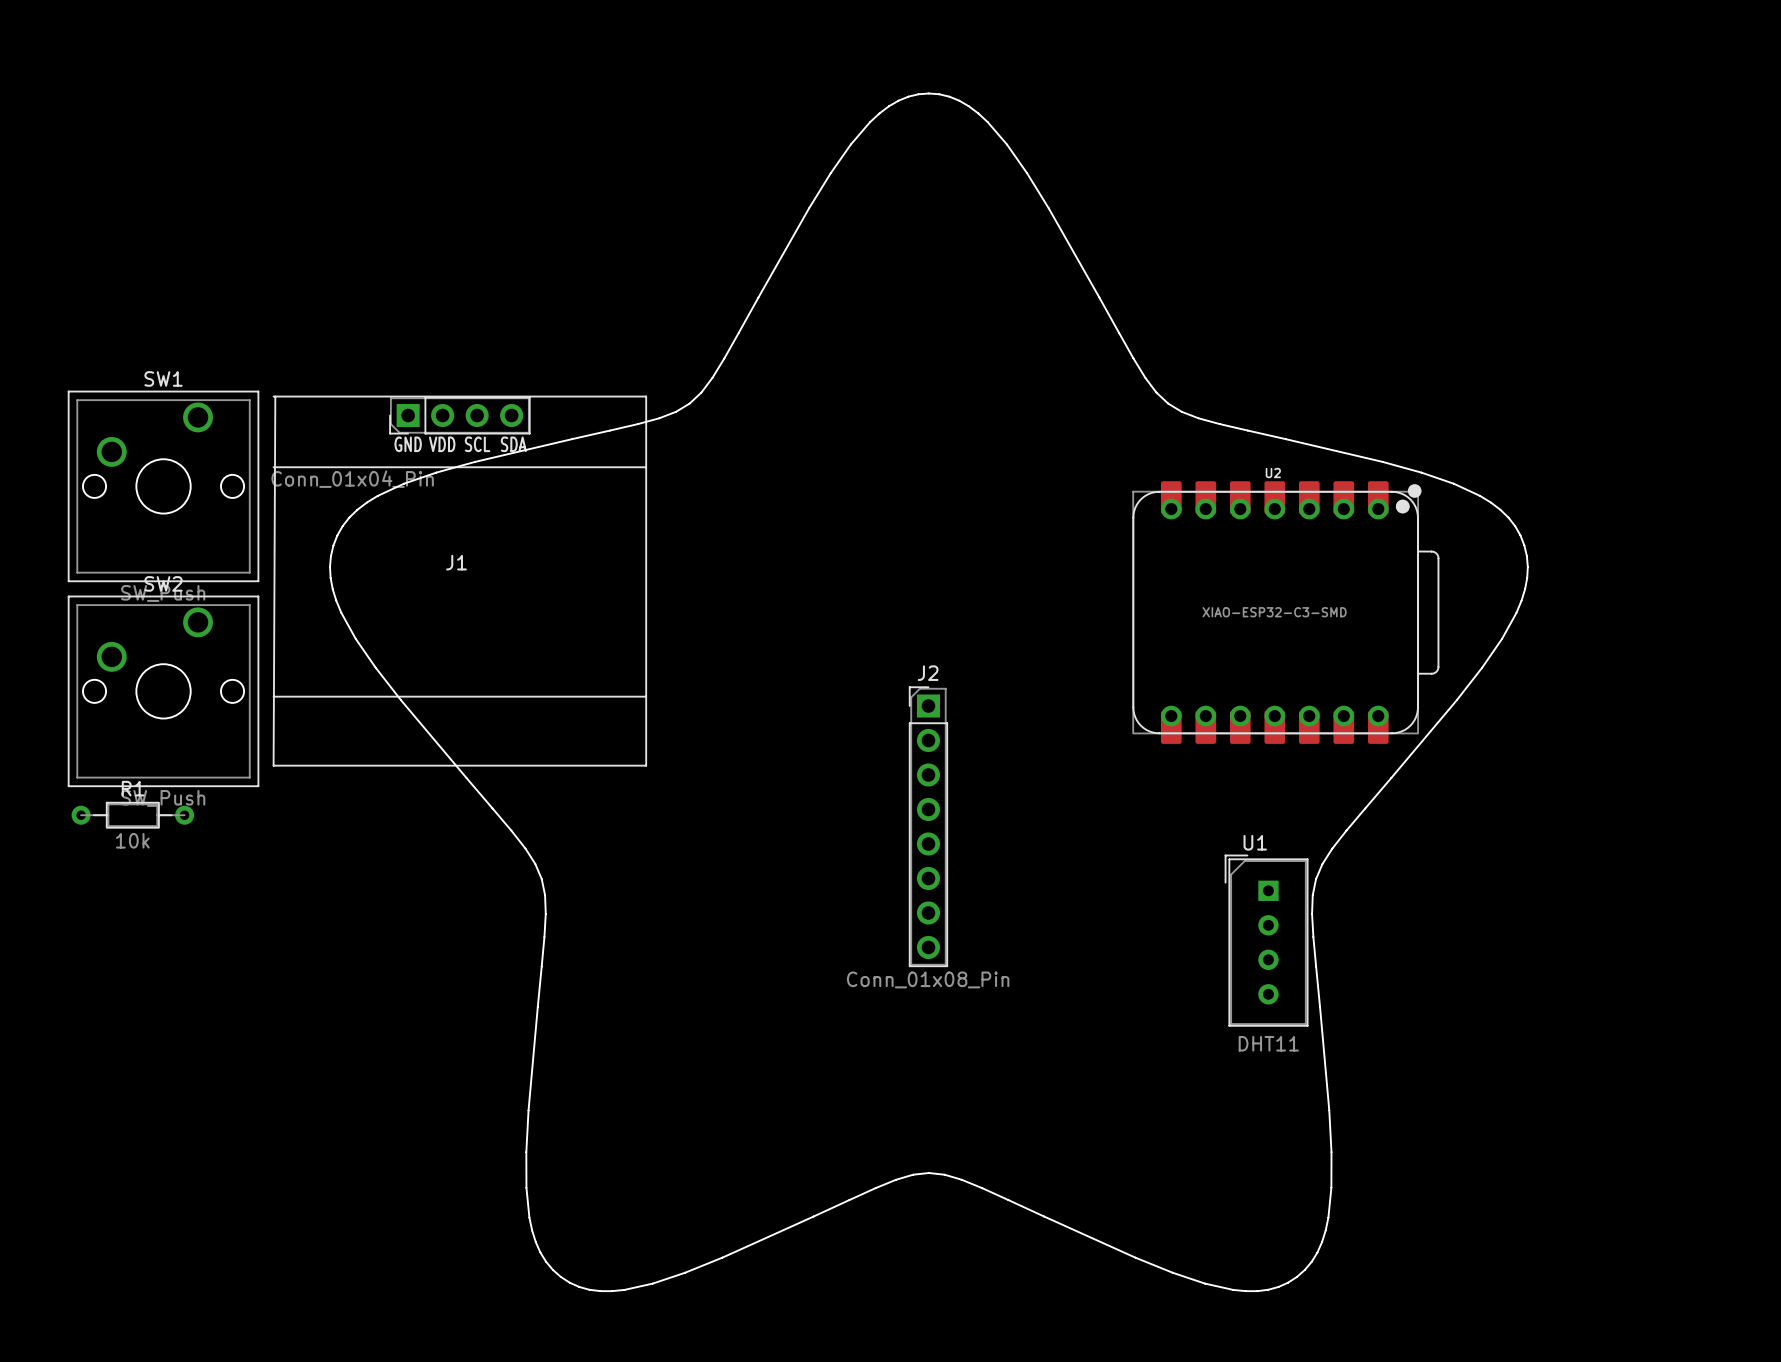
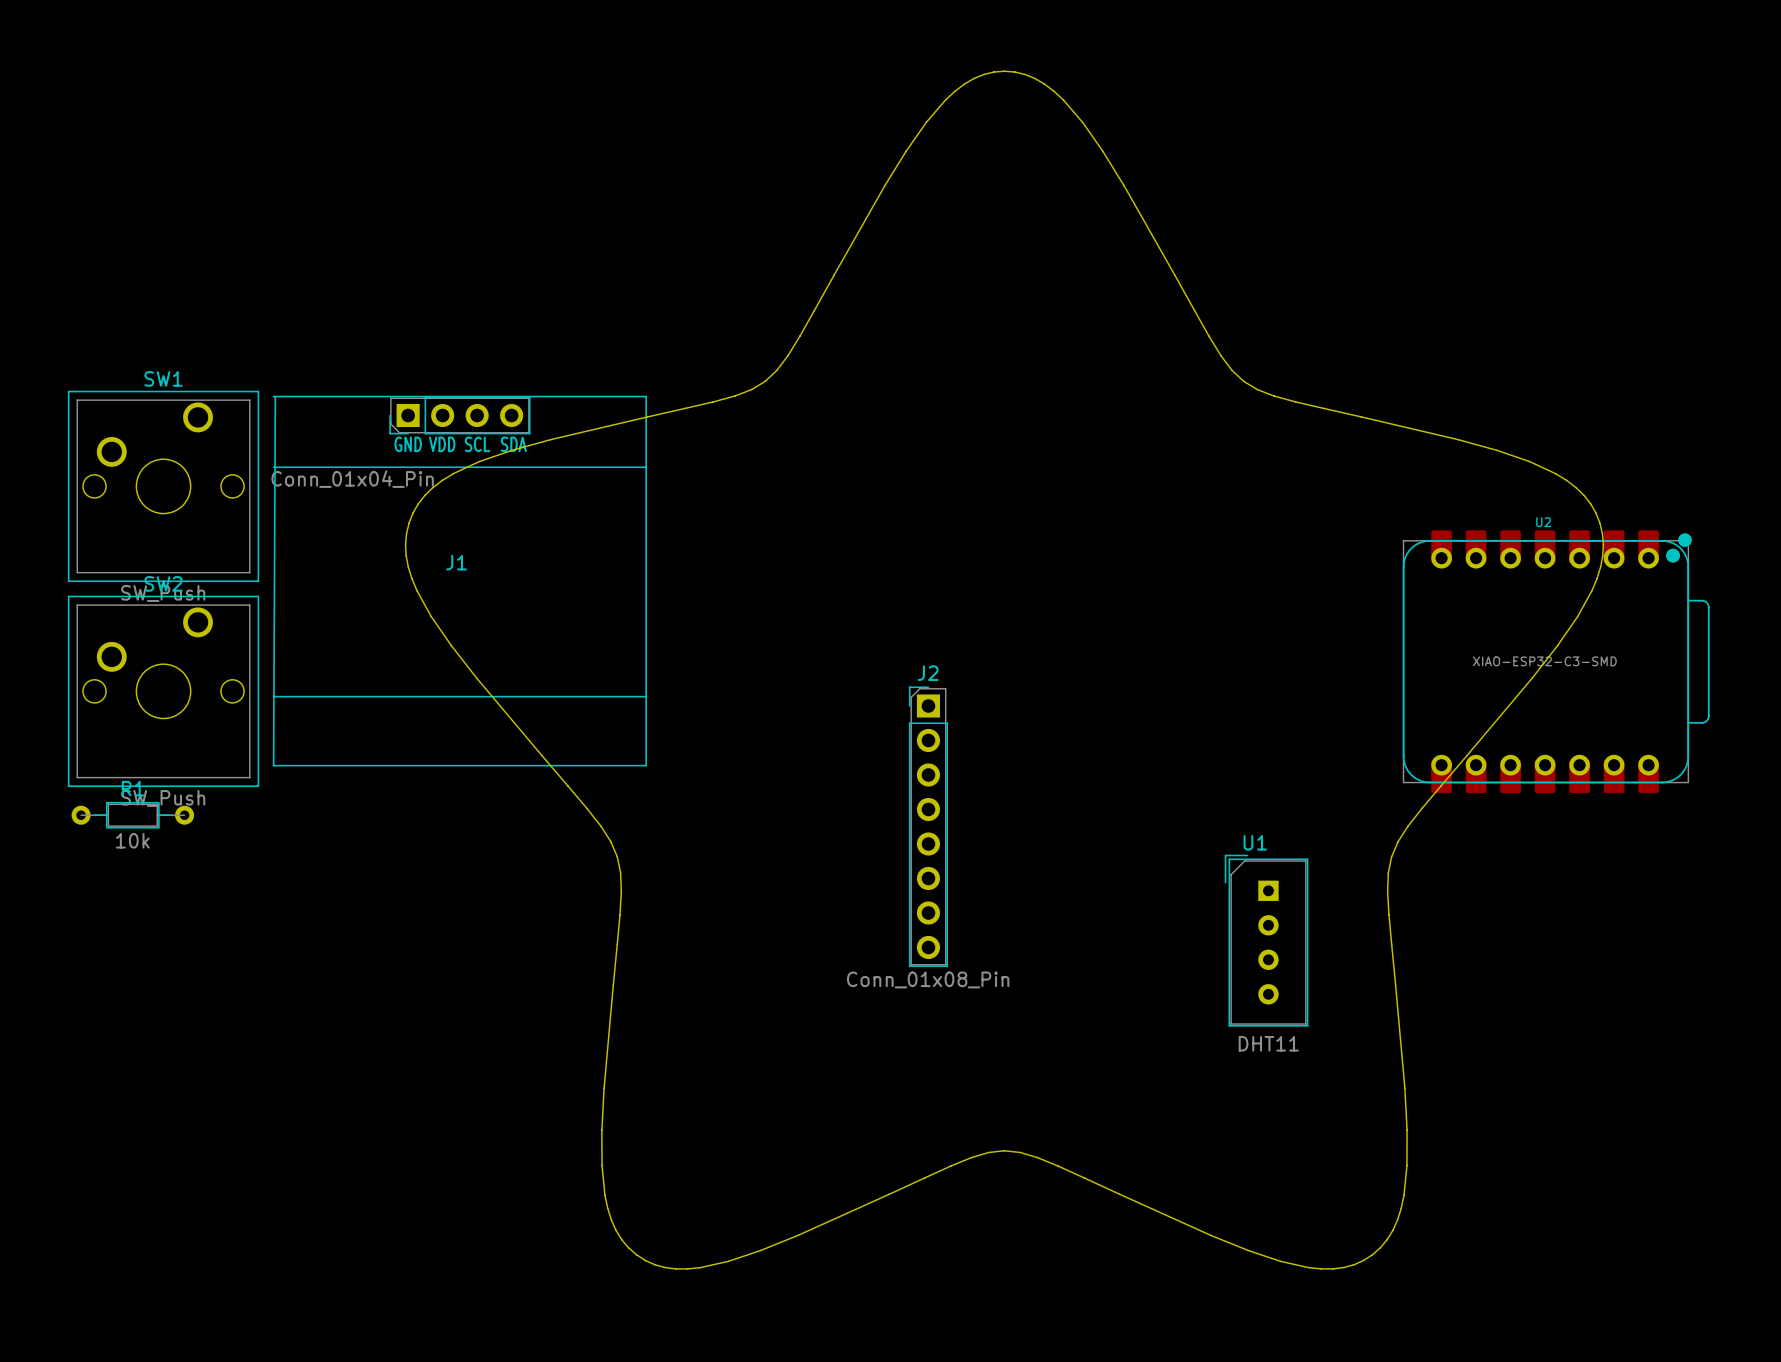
board edge: (928, 93) (908, 96) (889, 106) (870, 122) (850, 144) (809, 208) (712, 377) (689, 403) (659, 418) (436, 472) (404, 483) (377, 495) (349, 517) (337, 535) (330, 556) (330, 566) (332, 589) (341, 612) (355, 638) (375, 667) (525, 848) (541, 879) (545, 913) (528, 1110) (526, 1187) (529, 1217) (535, 1242) (546, 1261) (560, 1276) (579, 1286) (600, 1291) (624, 1289) (652, 1283) (722, 1257) (896, 1179) (913, 1174) (928, 1173) (944, 1174) (961, 1179) (1135, 1257) (1205, 1283) (1245, 1291) (1278, 1286) (1288, 1282) (1304, 1269) (1317, 1252) (1325, 1230) (1331, 1187) (1329, 1110) (1312, 913) (1316, 879) (1332, 848) (1456, 700) (1502, 638) (1516, 612) (1525, 589) (1527, 566) (1524, 545) (1515, 526) (1500, 509) (1480, 495) (1453, 483) (1382, 461) (1198, 418) (1168, 403) (1145, 377) (1048, 208) (1006, 144) (987, 122) (968, 106) (949, 96) (928, 93) -> (1004, 71) (983, 74) (964, 84) (945, 99) (926, 122) (884, 186) (787, 355) (765, 381) (734, 396) (511, 450) (479, 461) (453, 473) (424, 495) (412, 513) (406, 533) (405, 544) (408, 566) (416, 590) (431, 616) (451, 645) (601, 826) (617, 856) (621, 891) (604, 1088) (602, 1165) (604, 1195) (611, 1219) (621, 1239) (636, 1254) (654, 1264) (675, 1268) (700, 1267) (728, 1261) (797, 1235) (971, 1157) (988, 1152) (1004, 1150) (1020, 1152) (1037, 1157) (1210, 1235) (1280, 1261) (1321, 1268) (1354, 1264) (1363, 1260) (1380, 1247) (1392, 1230) (1401, 1208) (1406, 1165) (1404, 1088) (1387, 891) (1391, 856) (1407, 826) (1532, 677) (1577, 616) (1592, 590) (1600, 566) (1603, 544) (1599, 523) (1590, 503) (1576, 487) (1555, 473) (1529, 461) (1458, 439) (1274, 396) (1243, 381) (1220, 355) (1124, 186) (1082, 122) (1063, 99) (1044, 84) (1024, 74) (1004, 71)
U2 position: (1285, 612) -> (1556, 661)

